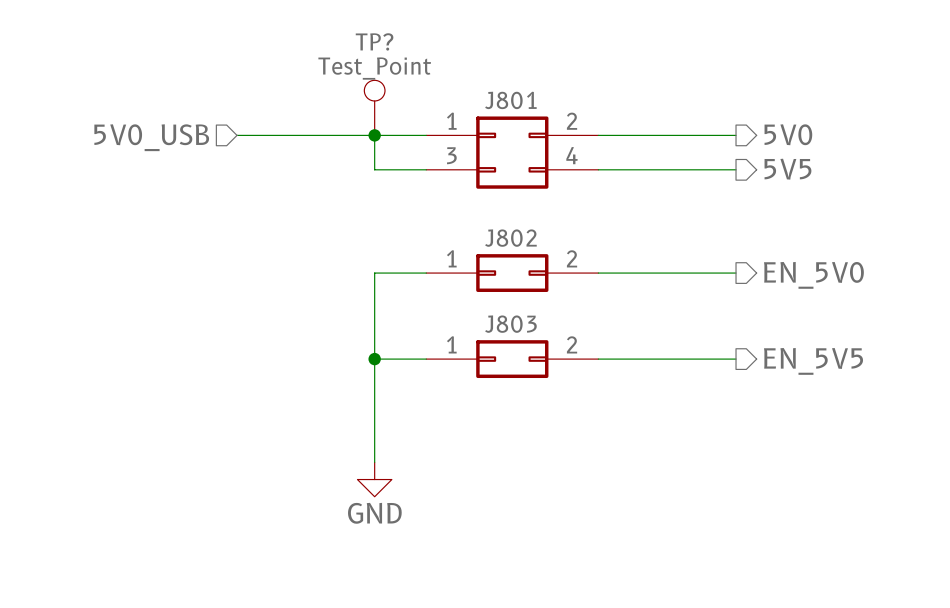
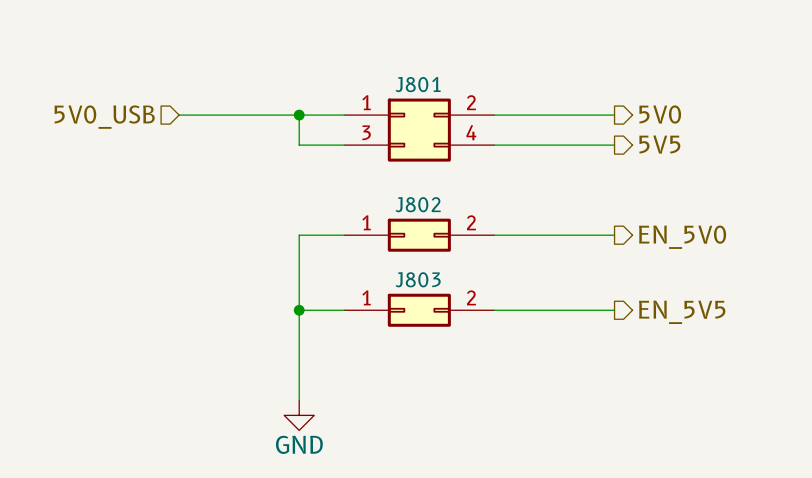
TP?: Test_Point (374, 107) -> none

